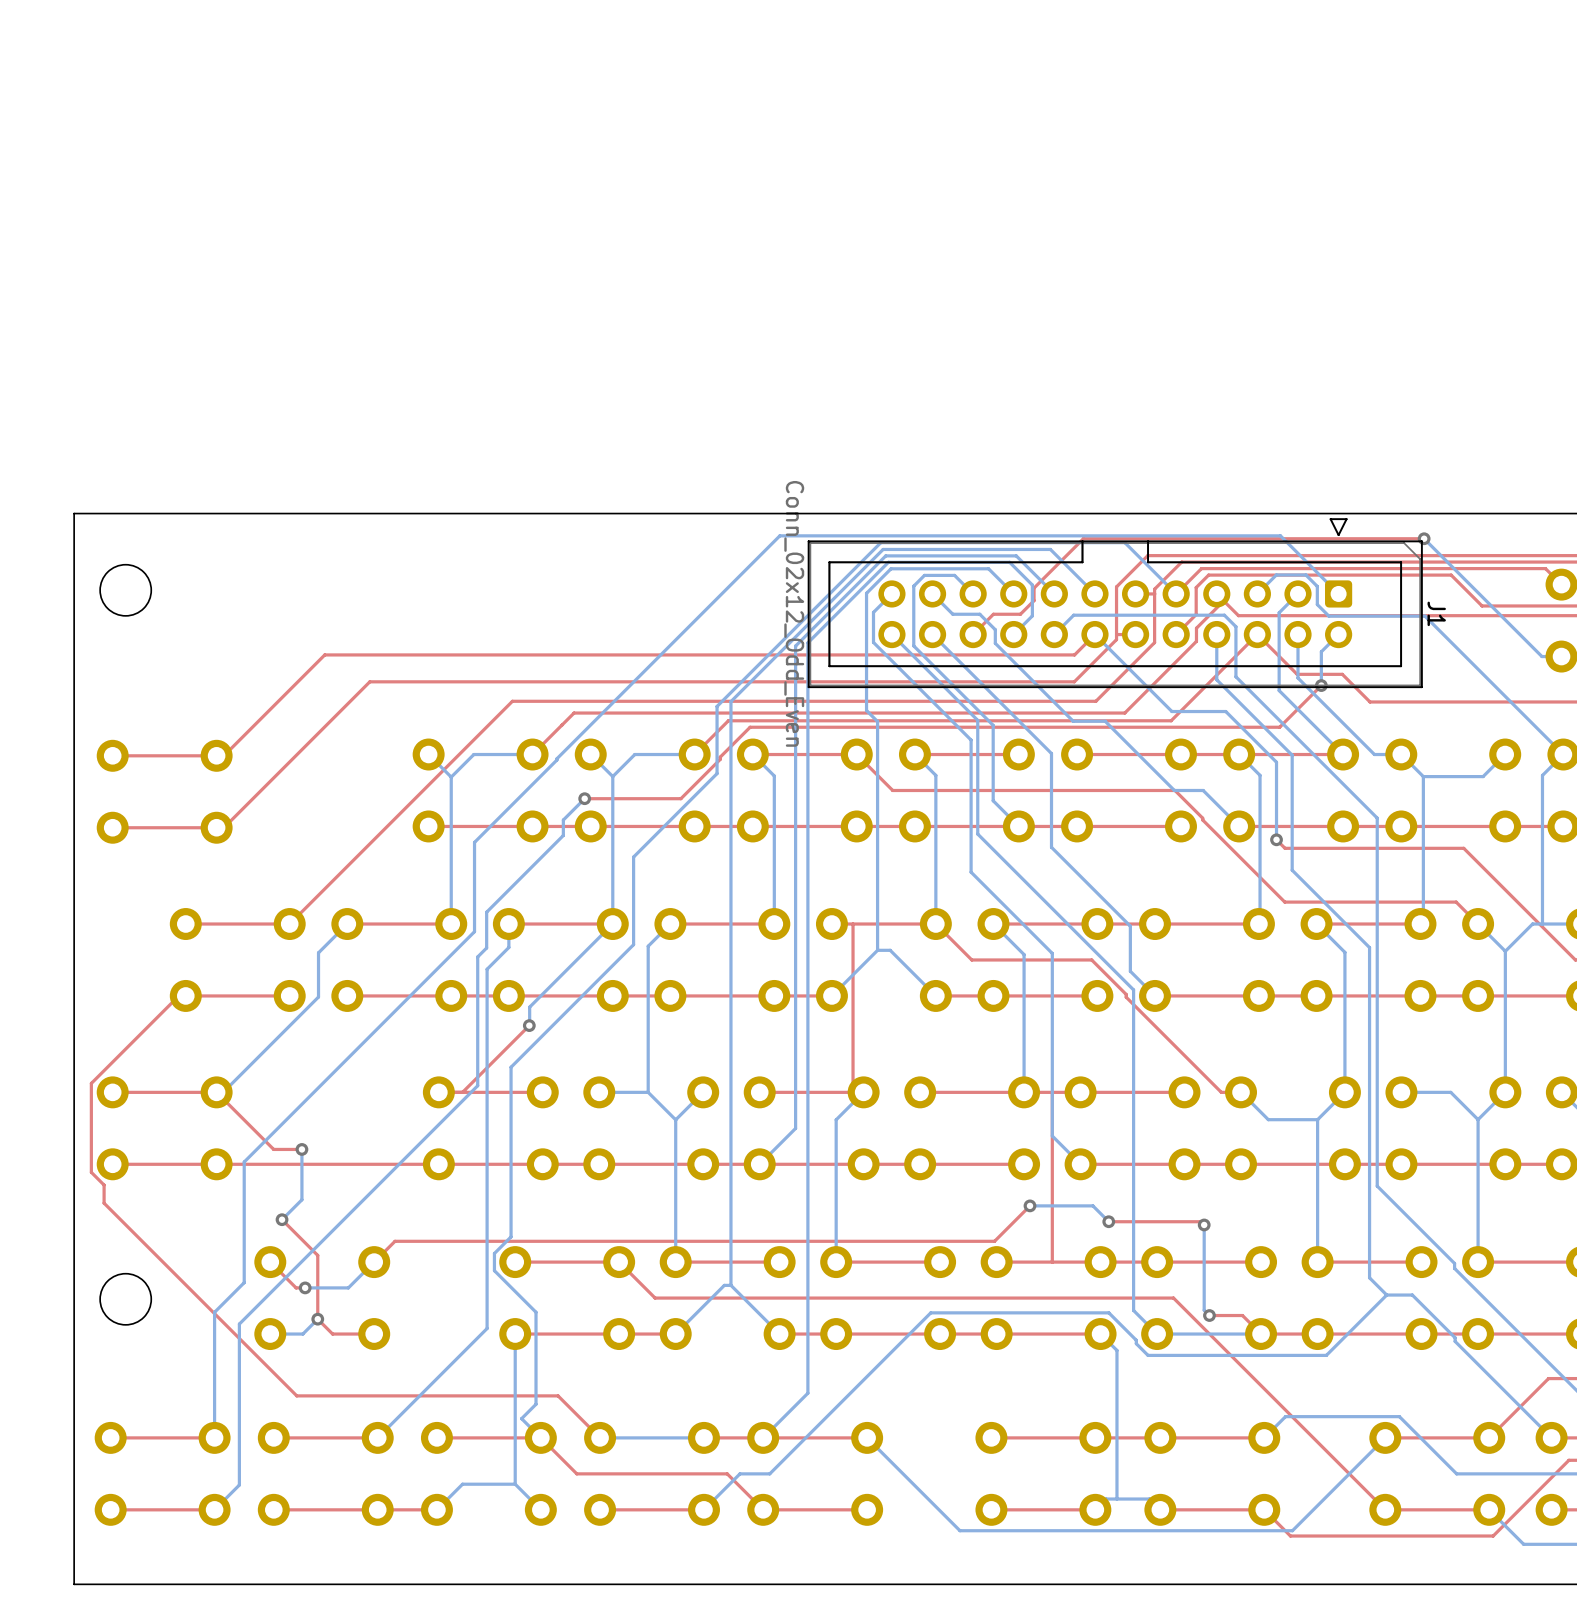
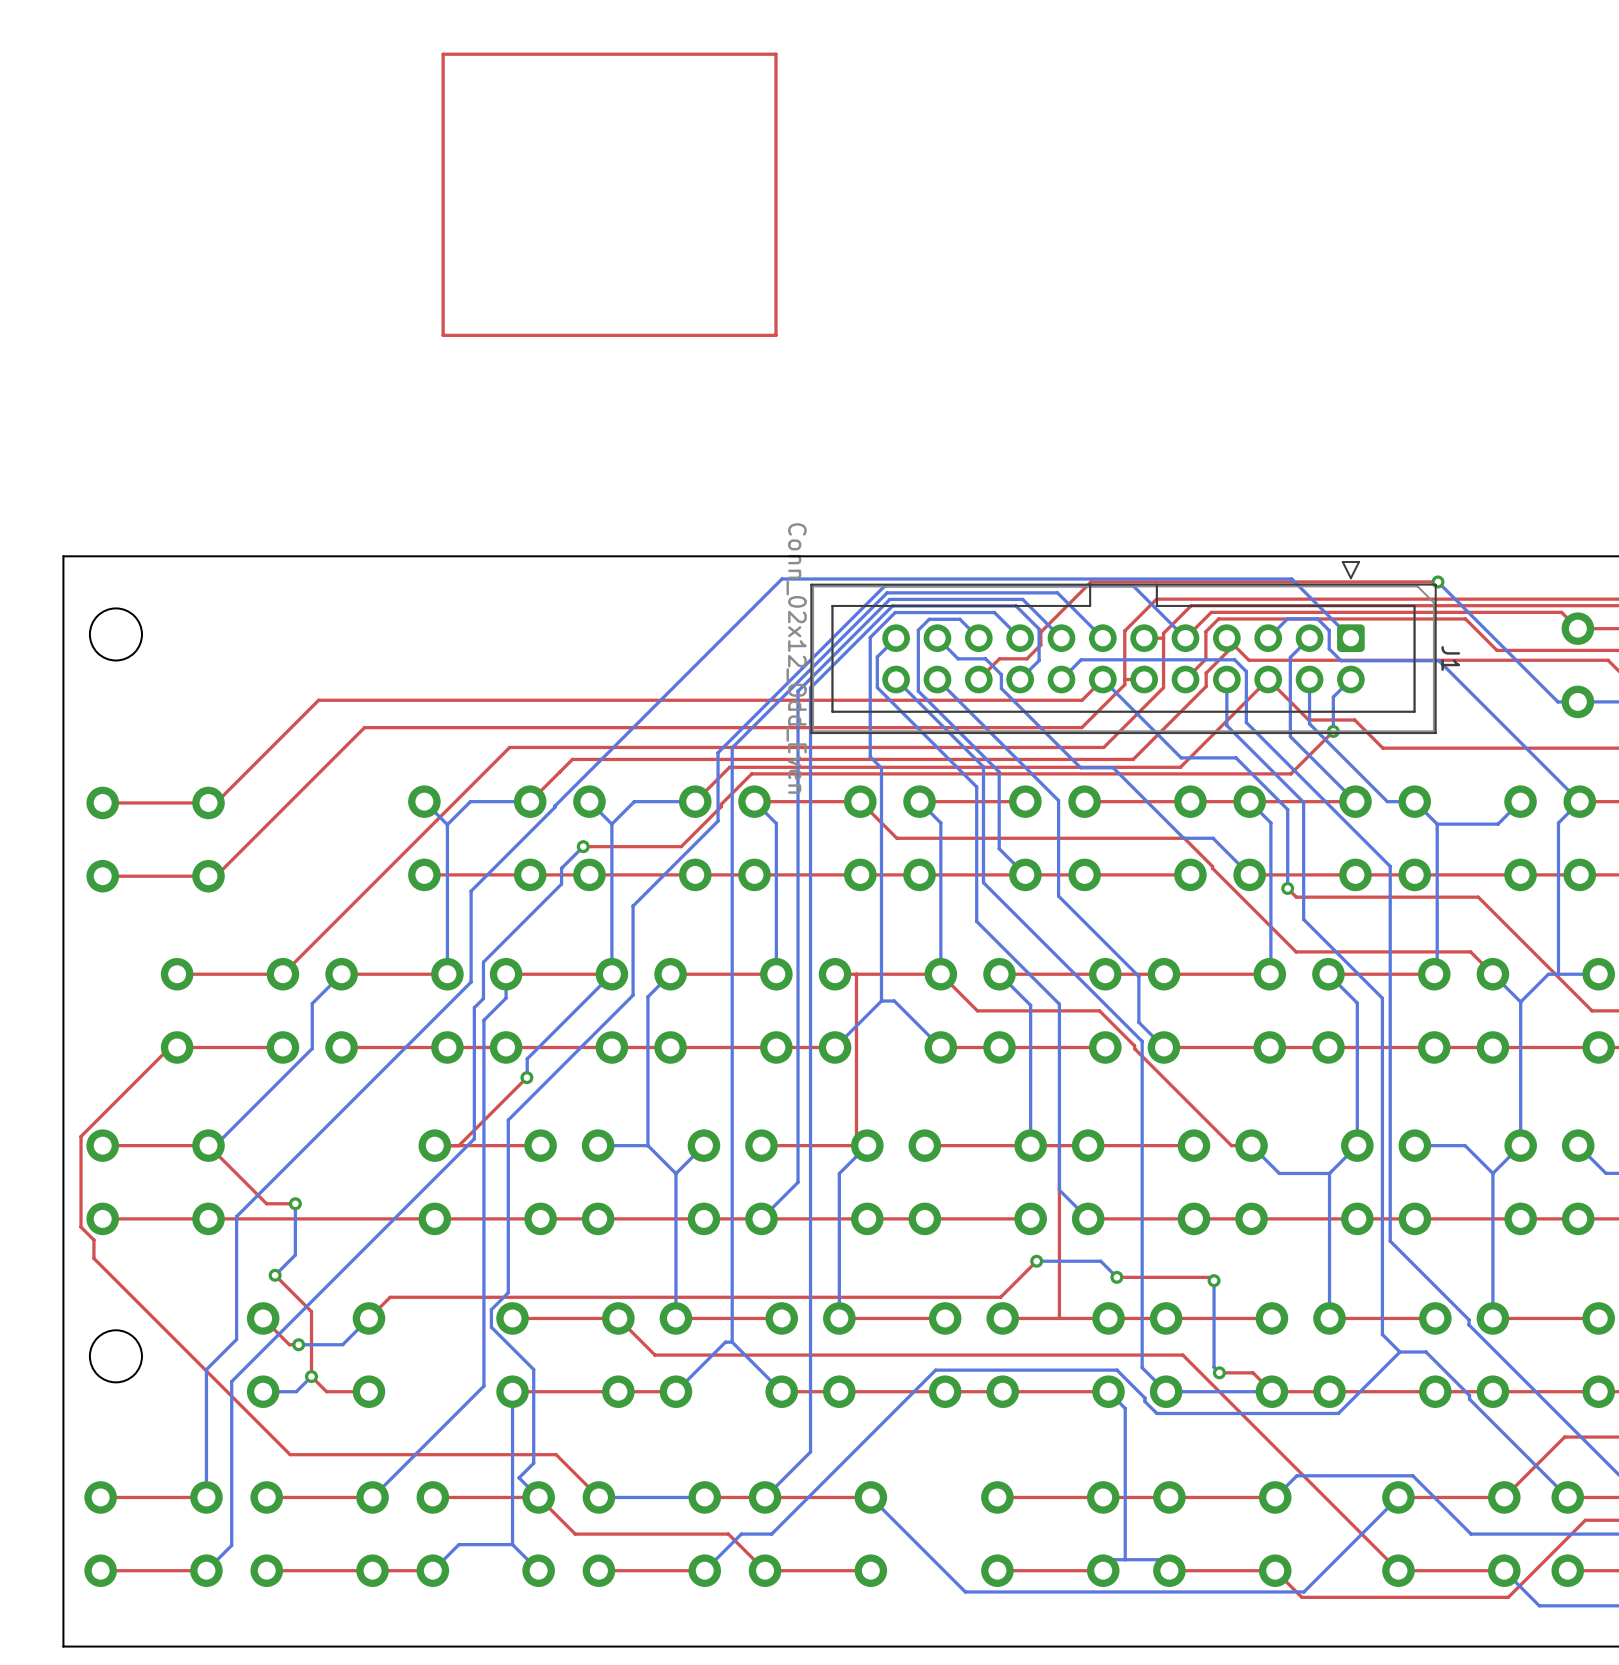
top track: none -> (775, 54) (443, 54) (443, 335) (775, 335) (775, 54)

